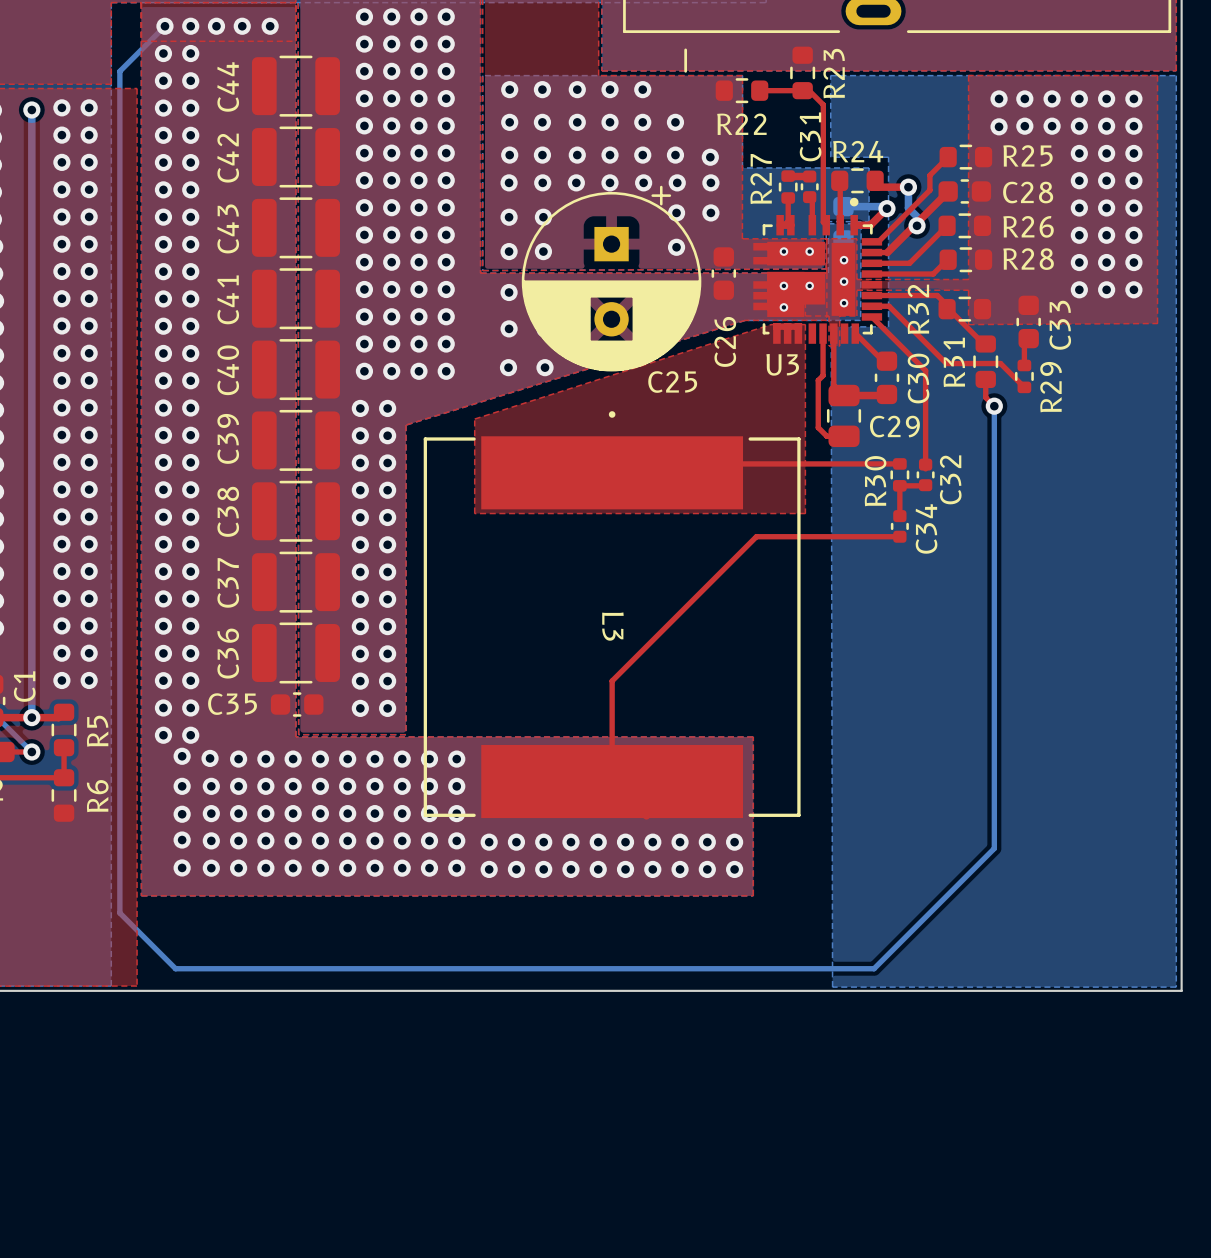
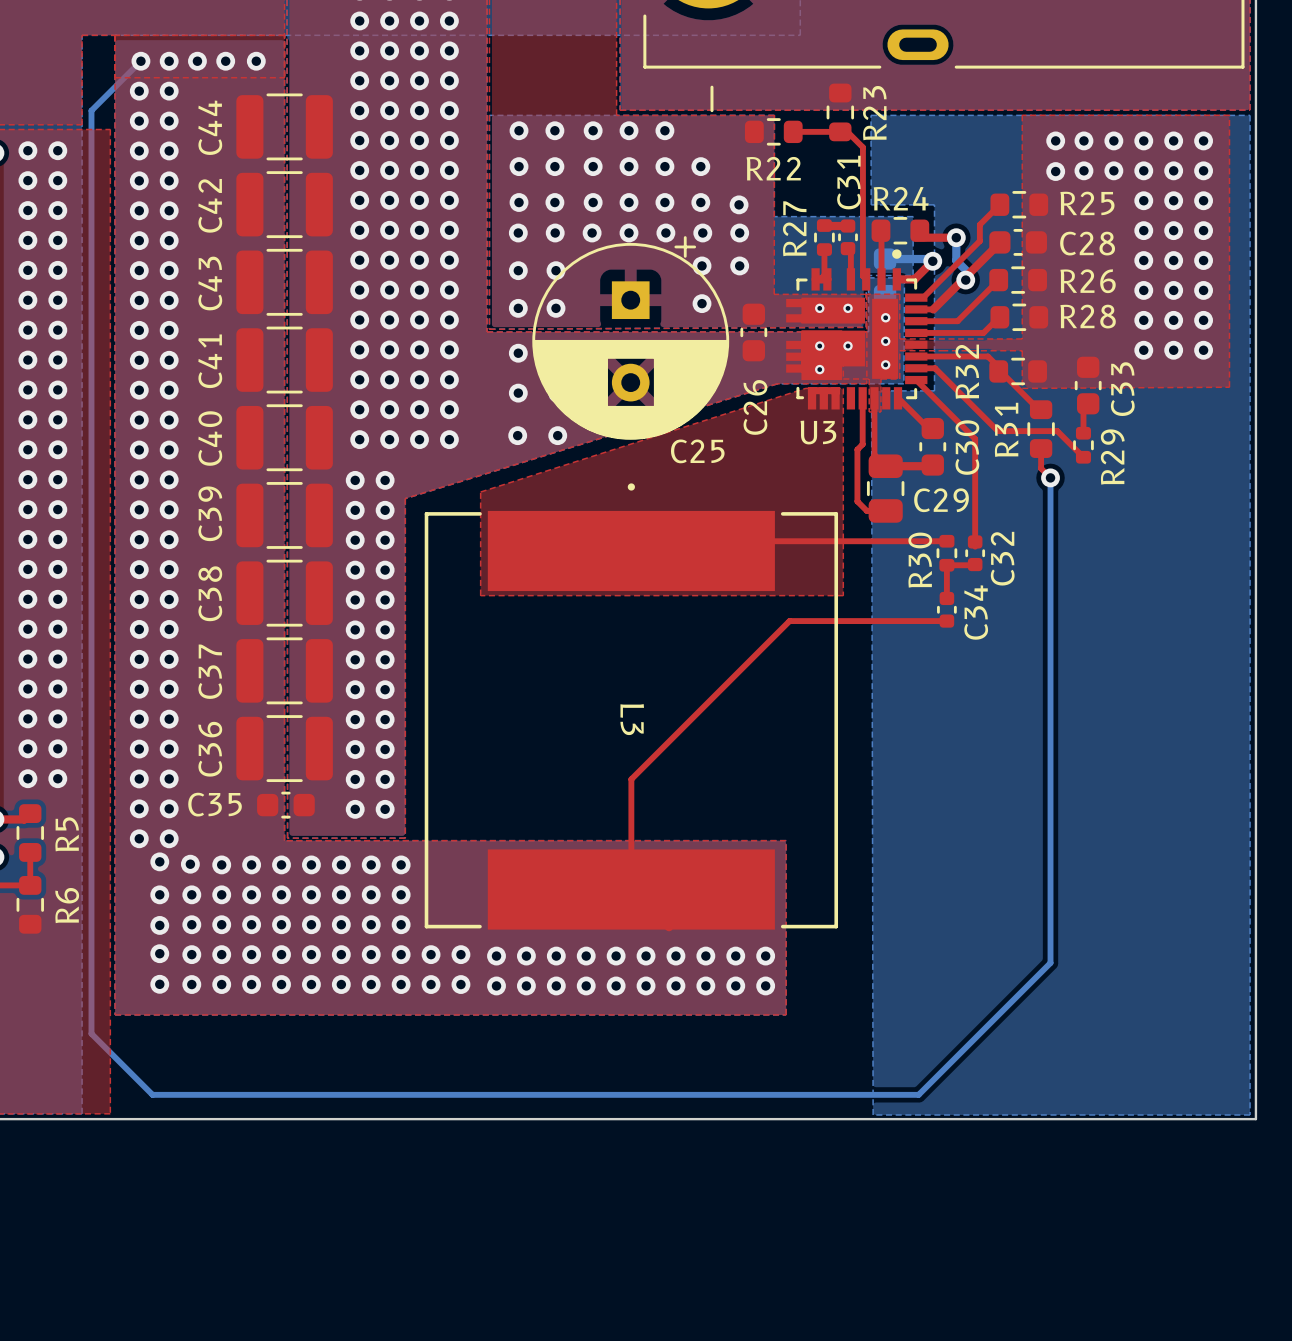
via: (429, 759) -> none
via: (456, 759) -> none
via: (429, 786) -> none
via: (456, 786) -> none
via: (429, 813) -> none
via: (456, 813) -> none

